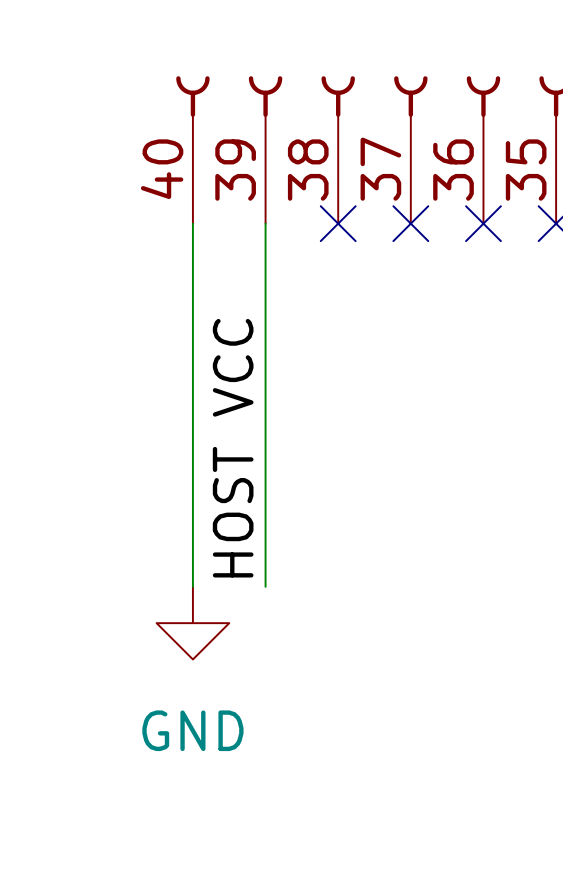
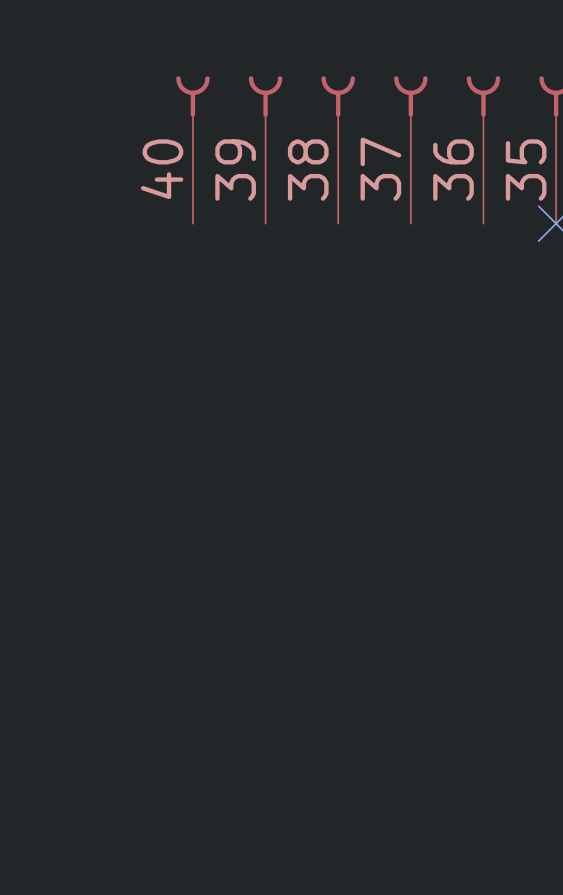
wire: (192, 223) (192, 586) -> none
wire: (265, 223) (265, 586) -> none
no-connect mark: (338, 223) -> none
no-connect mark: (410, 223) -> none
no-connect mark: (483, 223) -> none
label: HOST VCC (233, 448) -> none
power symbol: GND (192, 623) -> none

